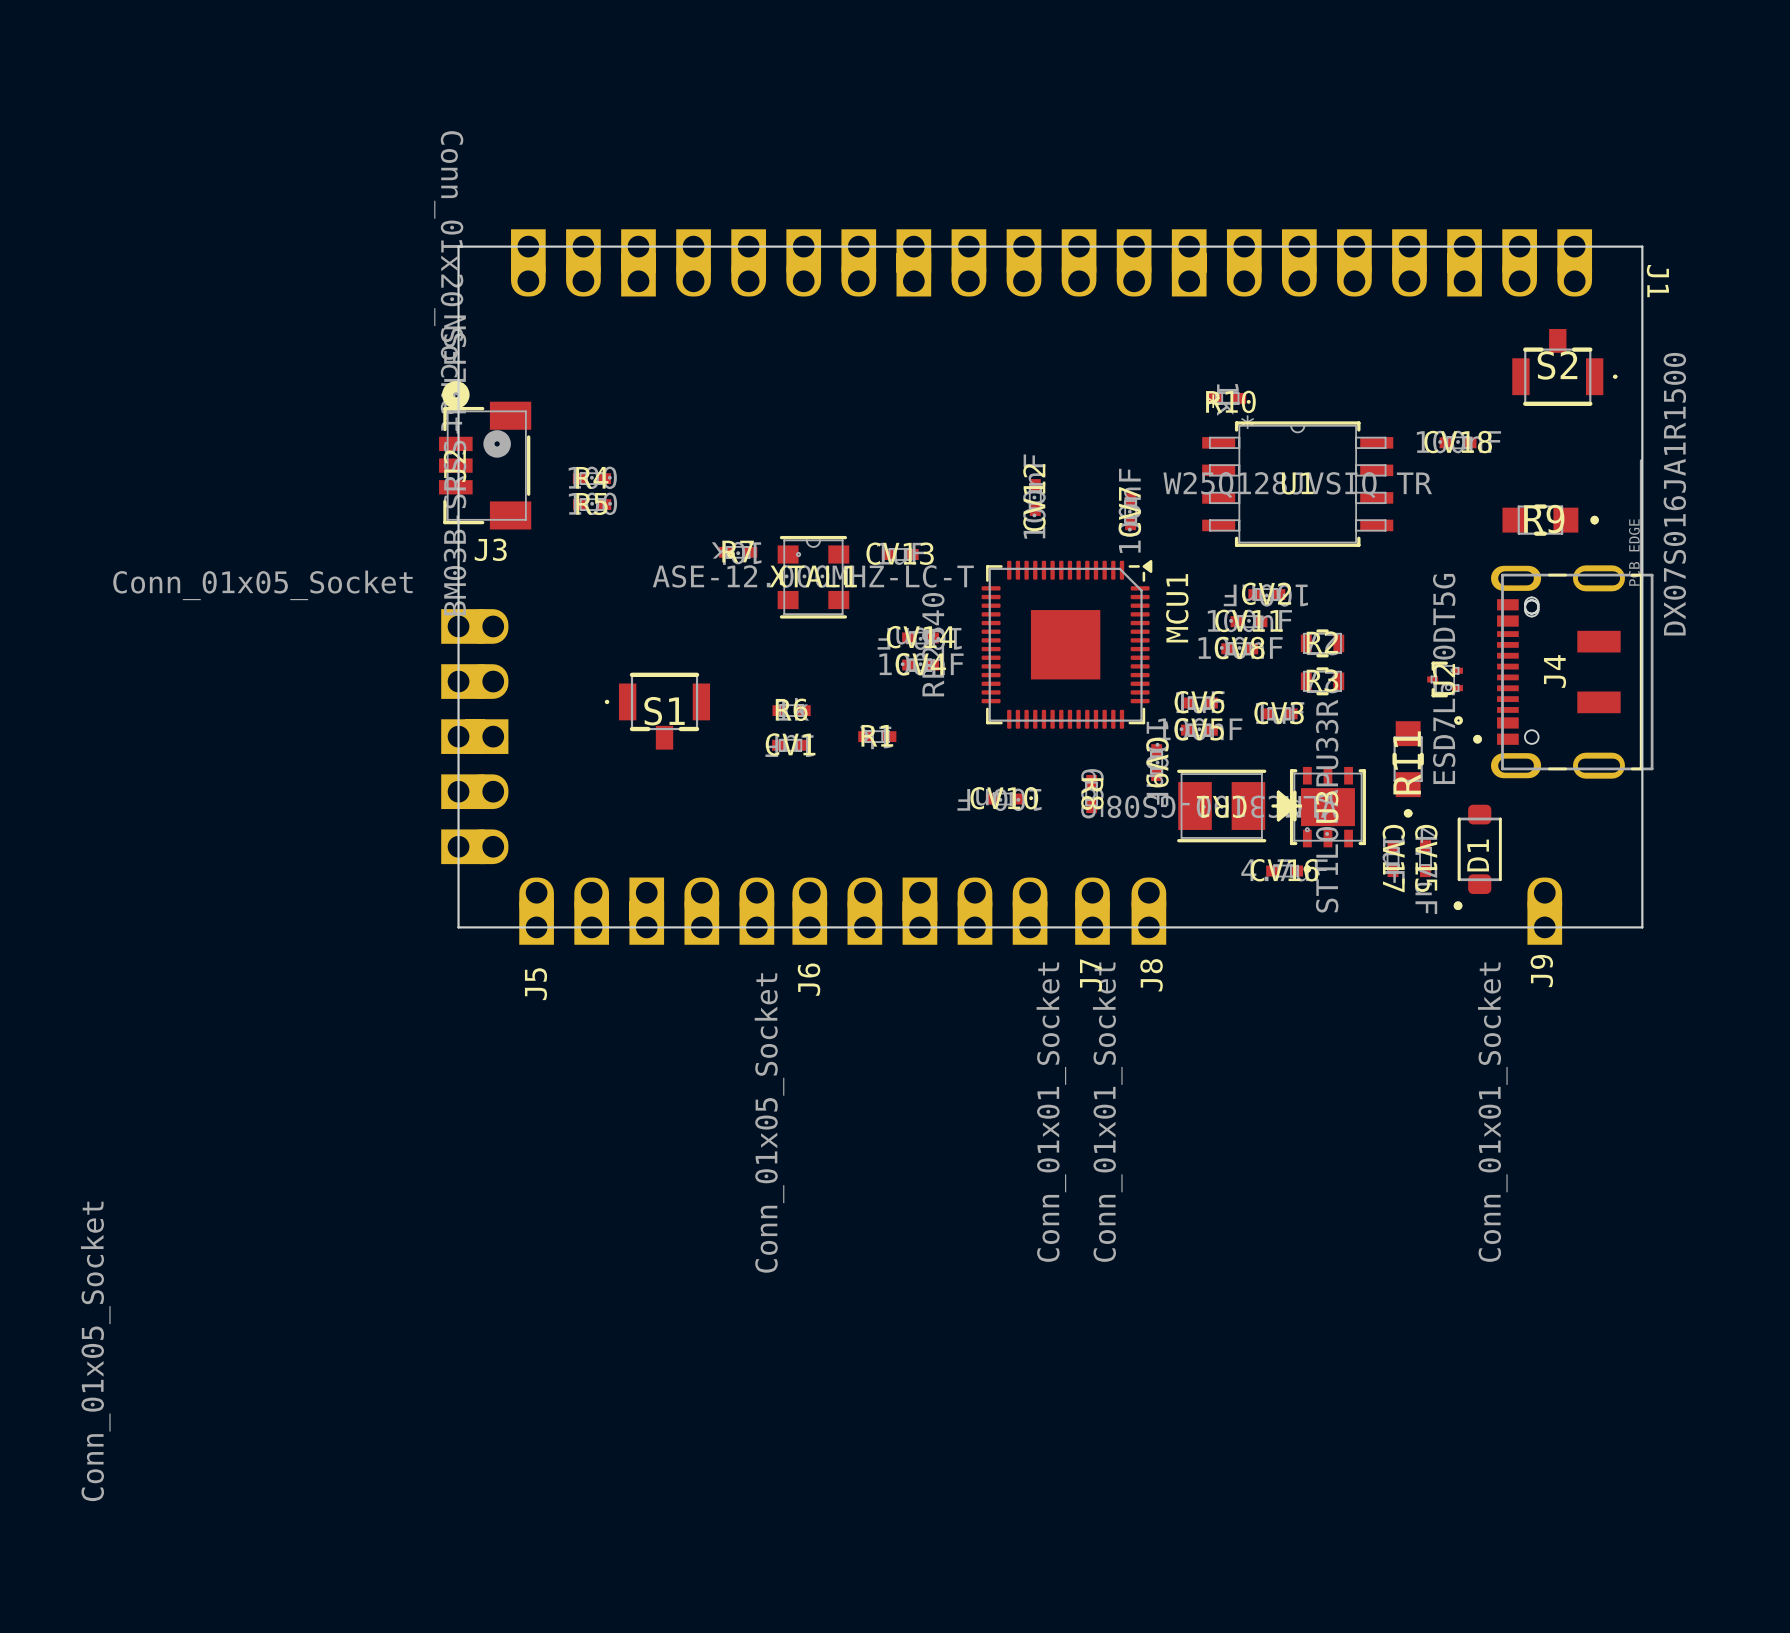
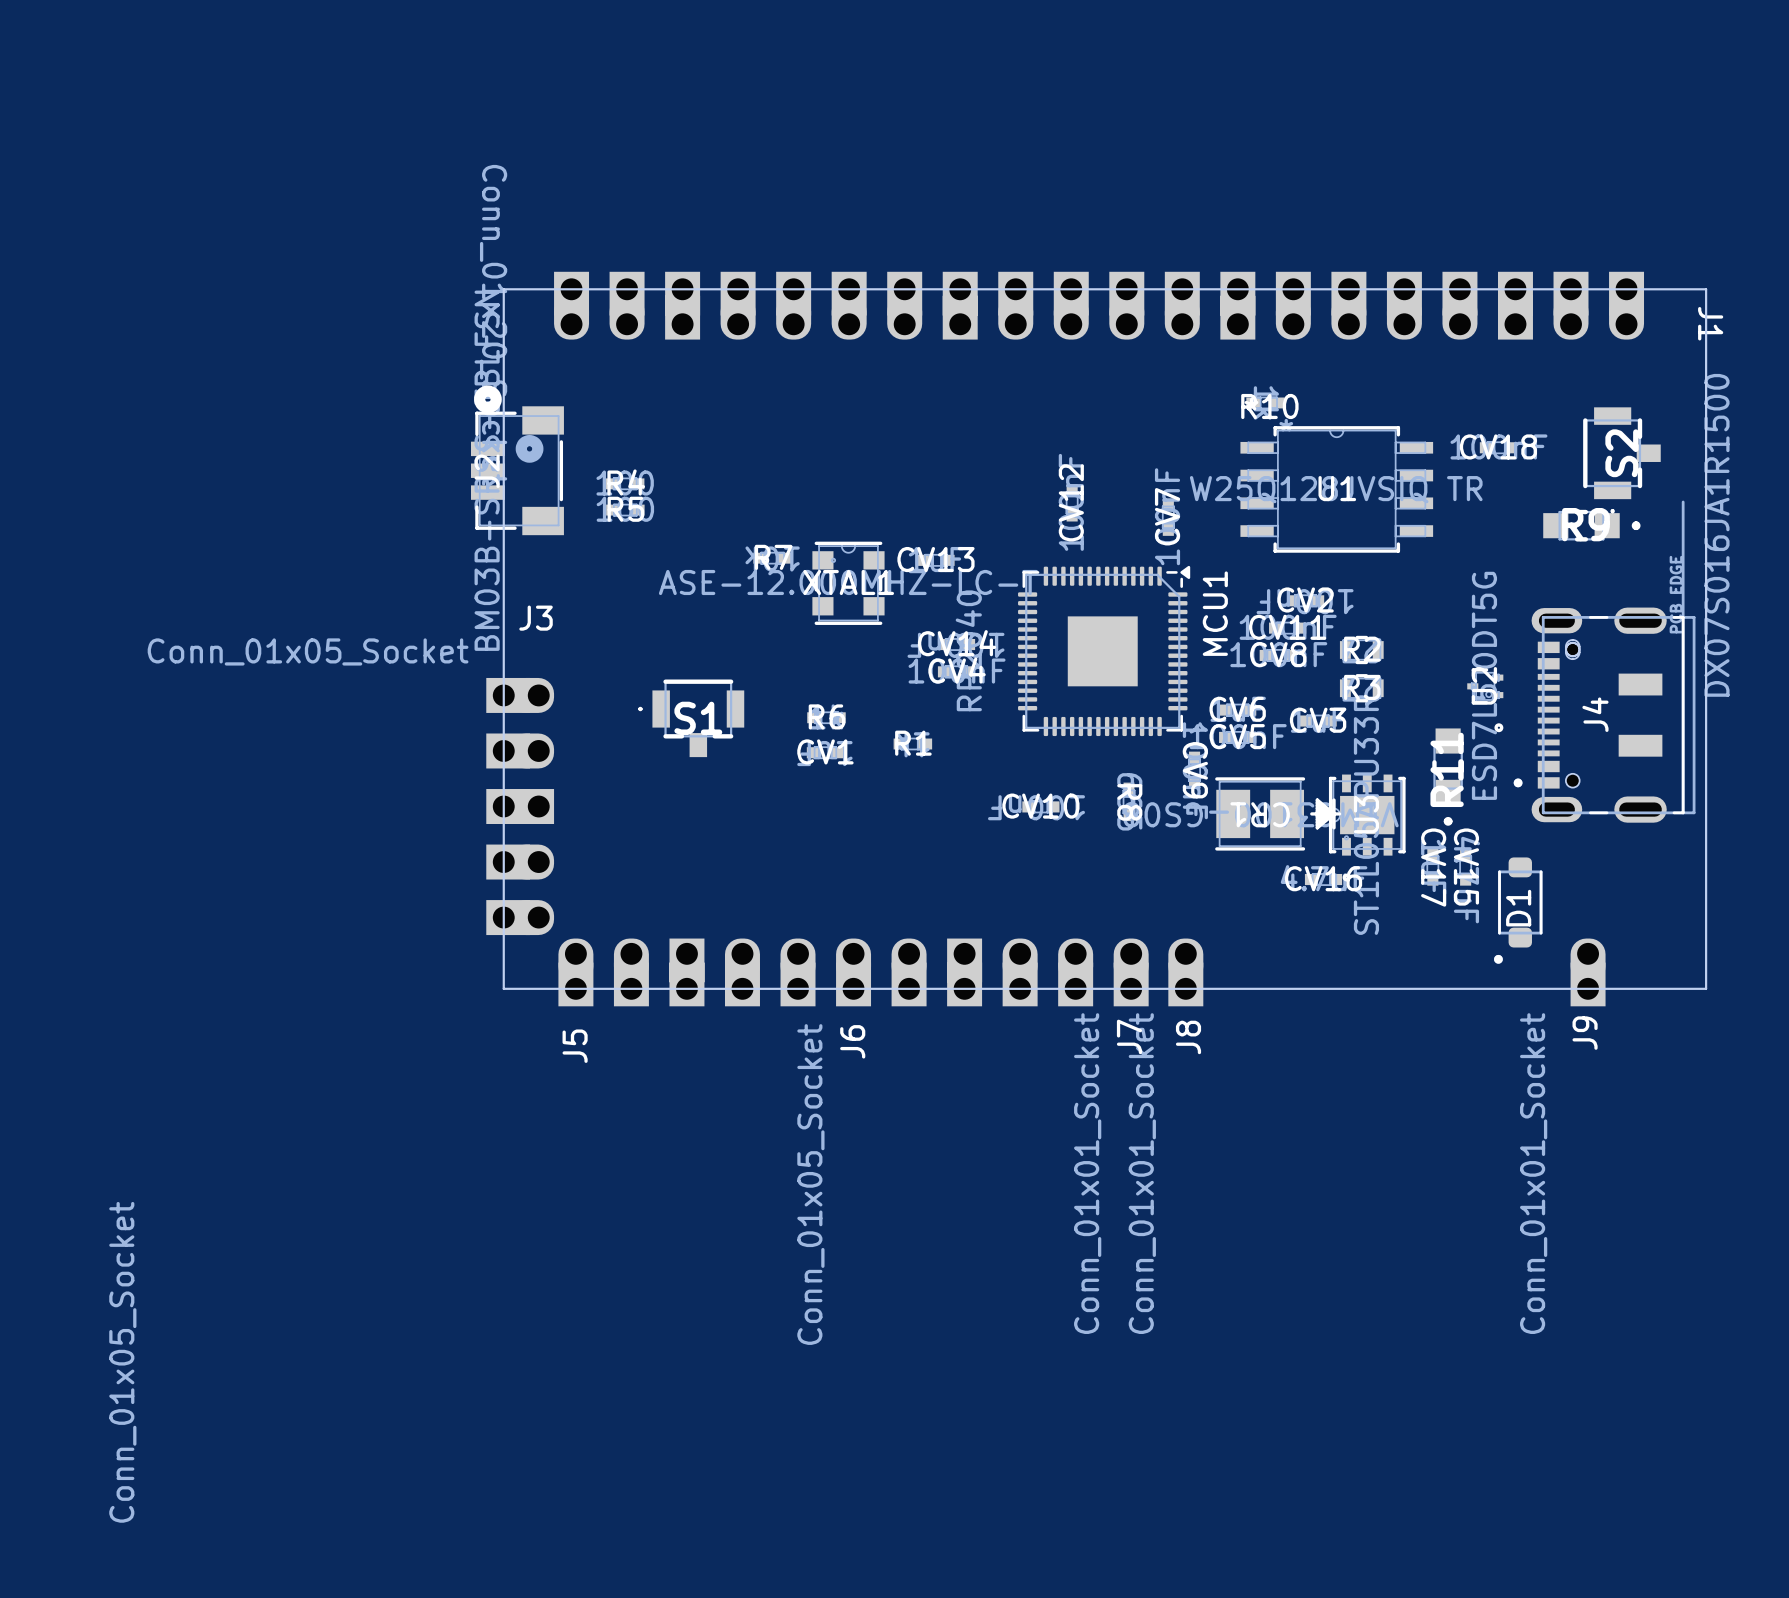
board edge: (458, 246) (1642, 246) (1642, 927) (458, 927) (458, 246) -> (503, 289) (503, 988) (1706, 988) (1706, 289) (503, 289)
J1 position: (1051, 262) -> (1099, 305)
S2 rotation: 0° (1564, 367) -> 90° clockwise (1621, 460)
S2 position: (1564, 367) -> (1621, 460)
J4 position: (1563, 618) -> (1604, 661)
J3 position: (474, 736) -> (520, 806)
D1 position: (1477, 857) -> (1518, 910)
J5 position: (646, 911) -> (686, 972)
J6 position: (919, 911) -> (964, 972)
J7 position: (1092, 911) -> (1131, 972)
J8 position: (1148, 911) -> (1185, 972)
J9 position: (1544, 911) -> (1588, 972)

